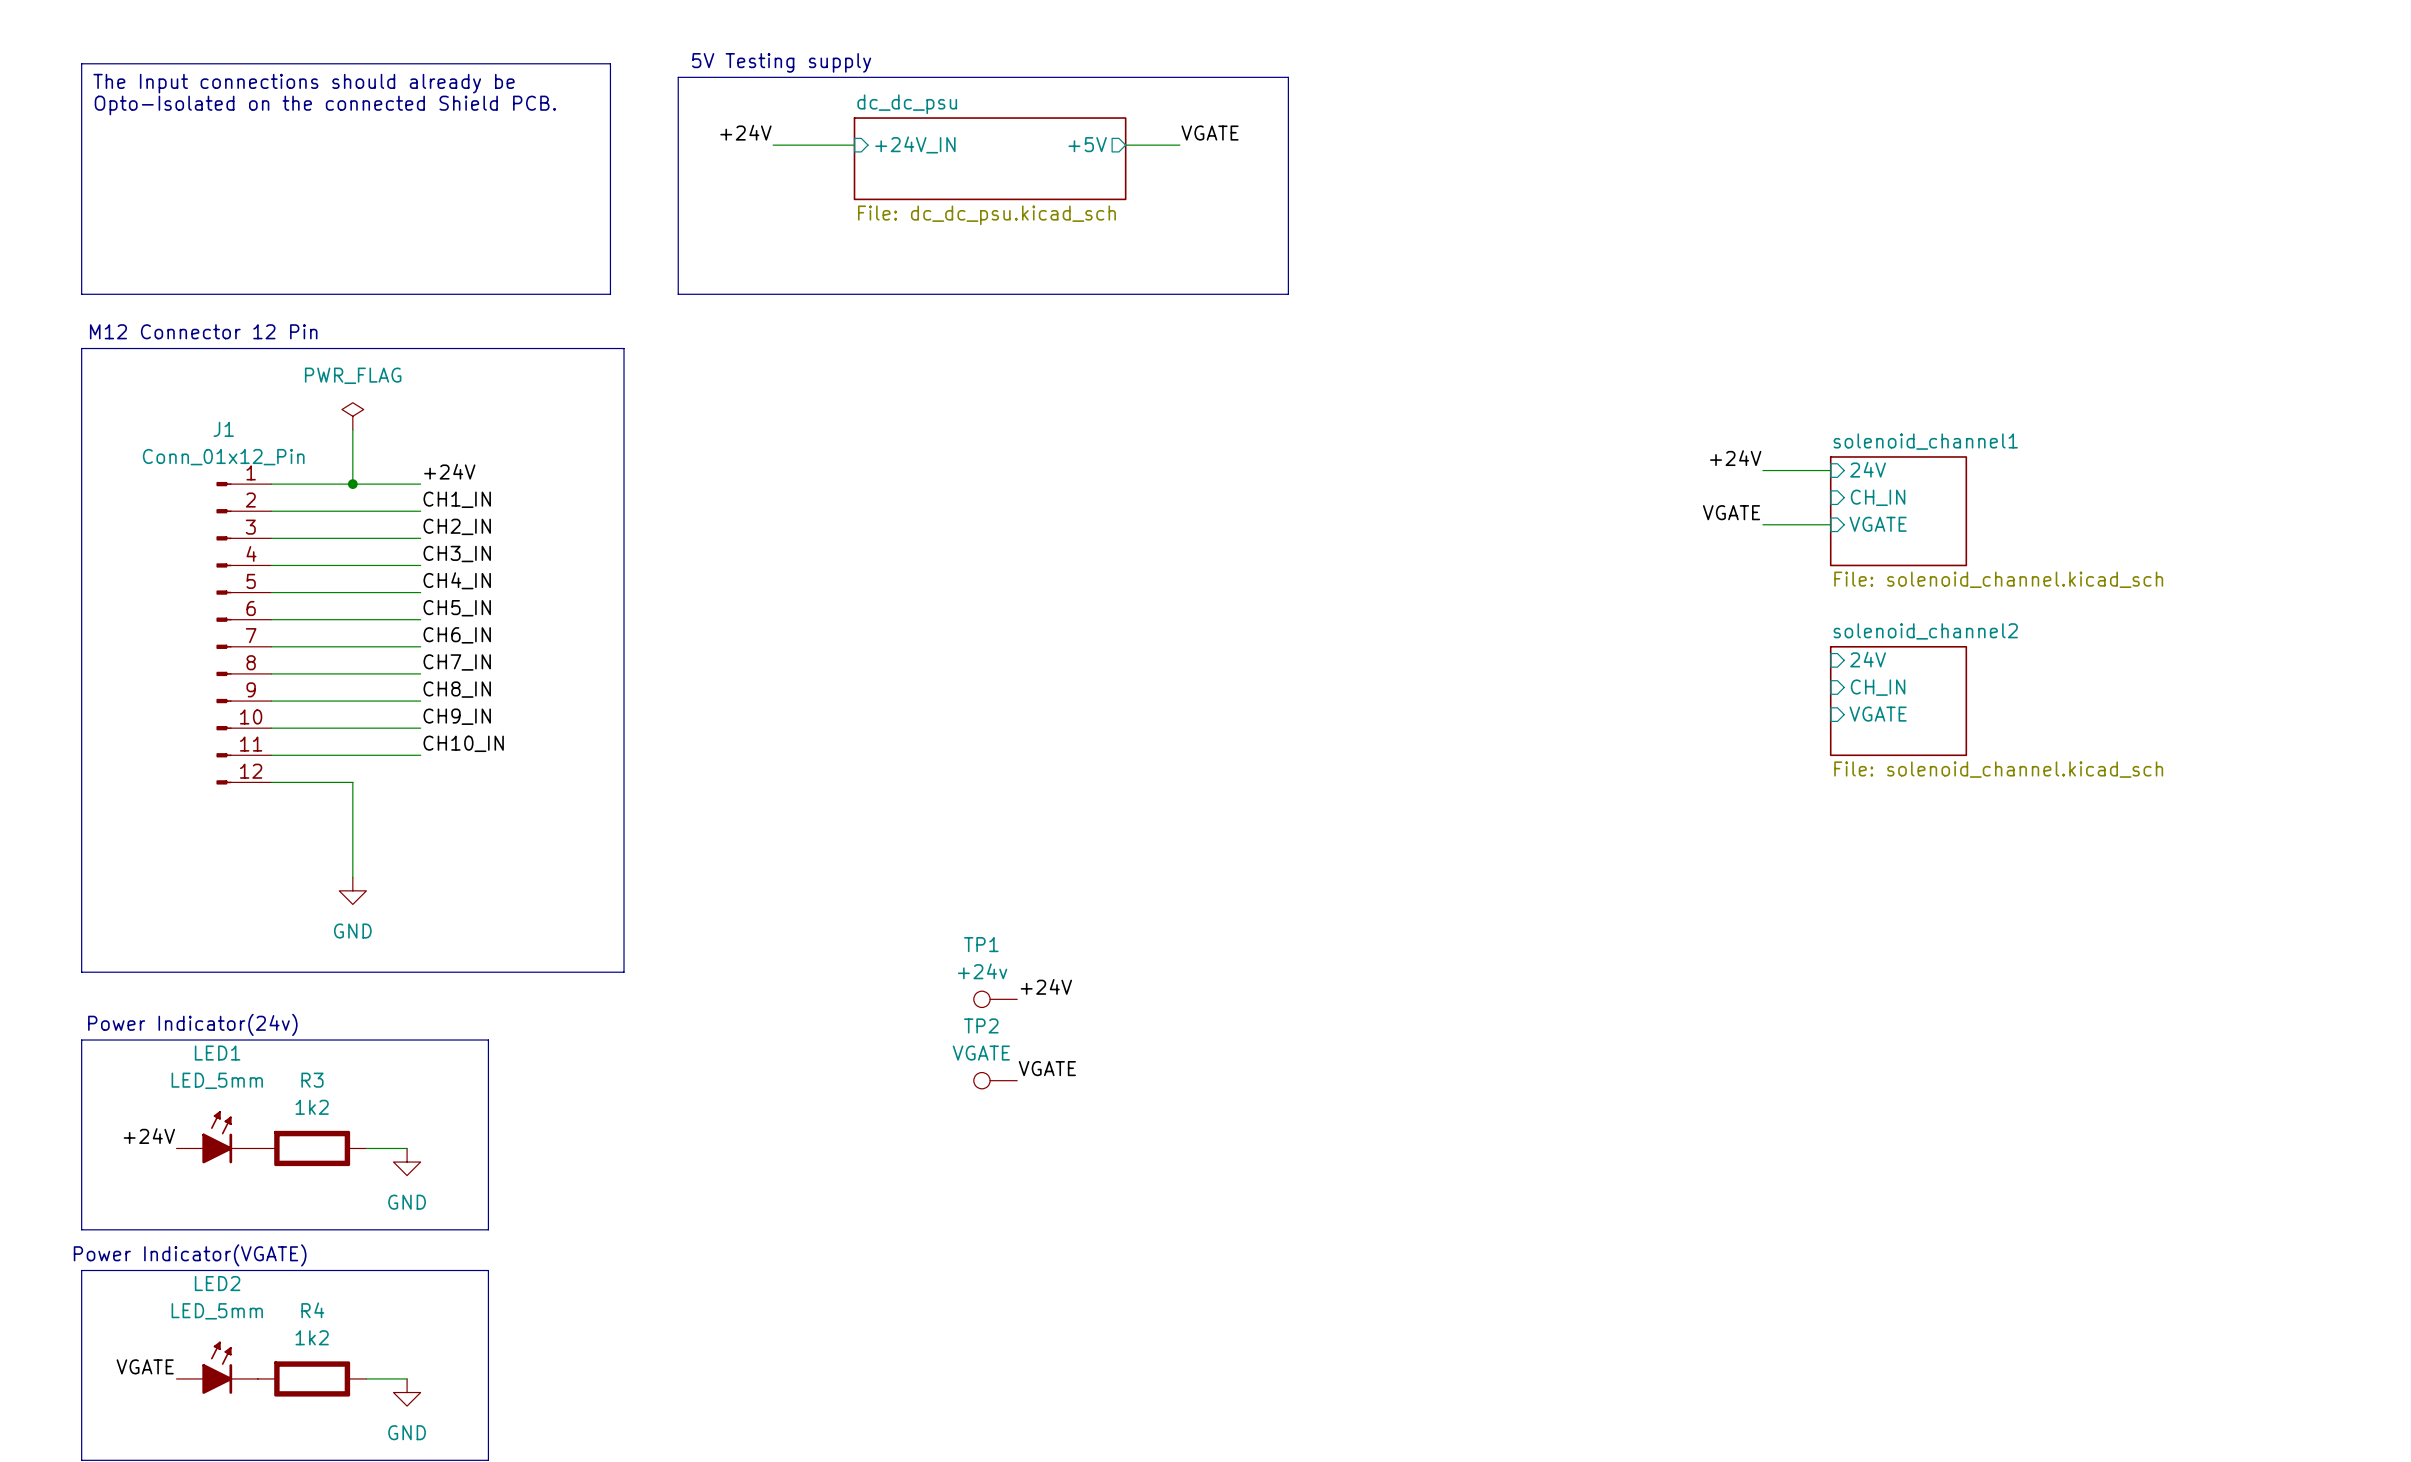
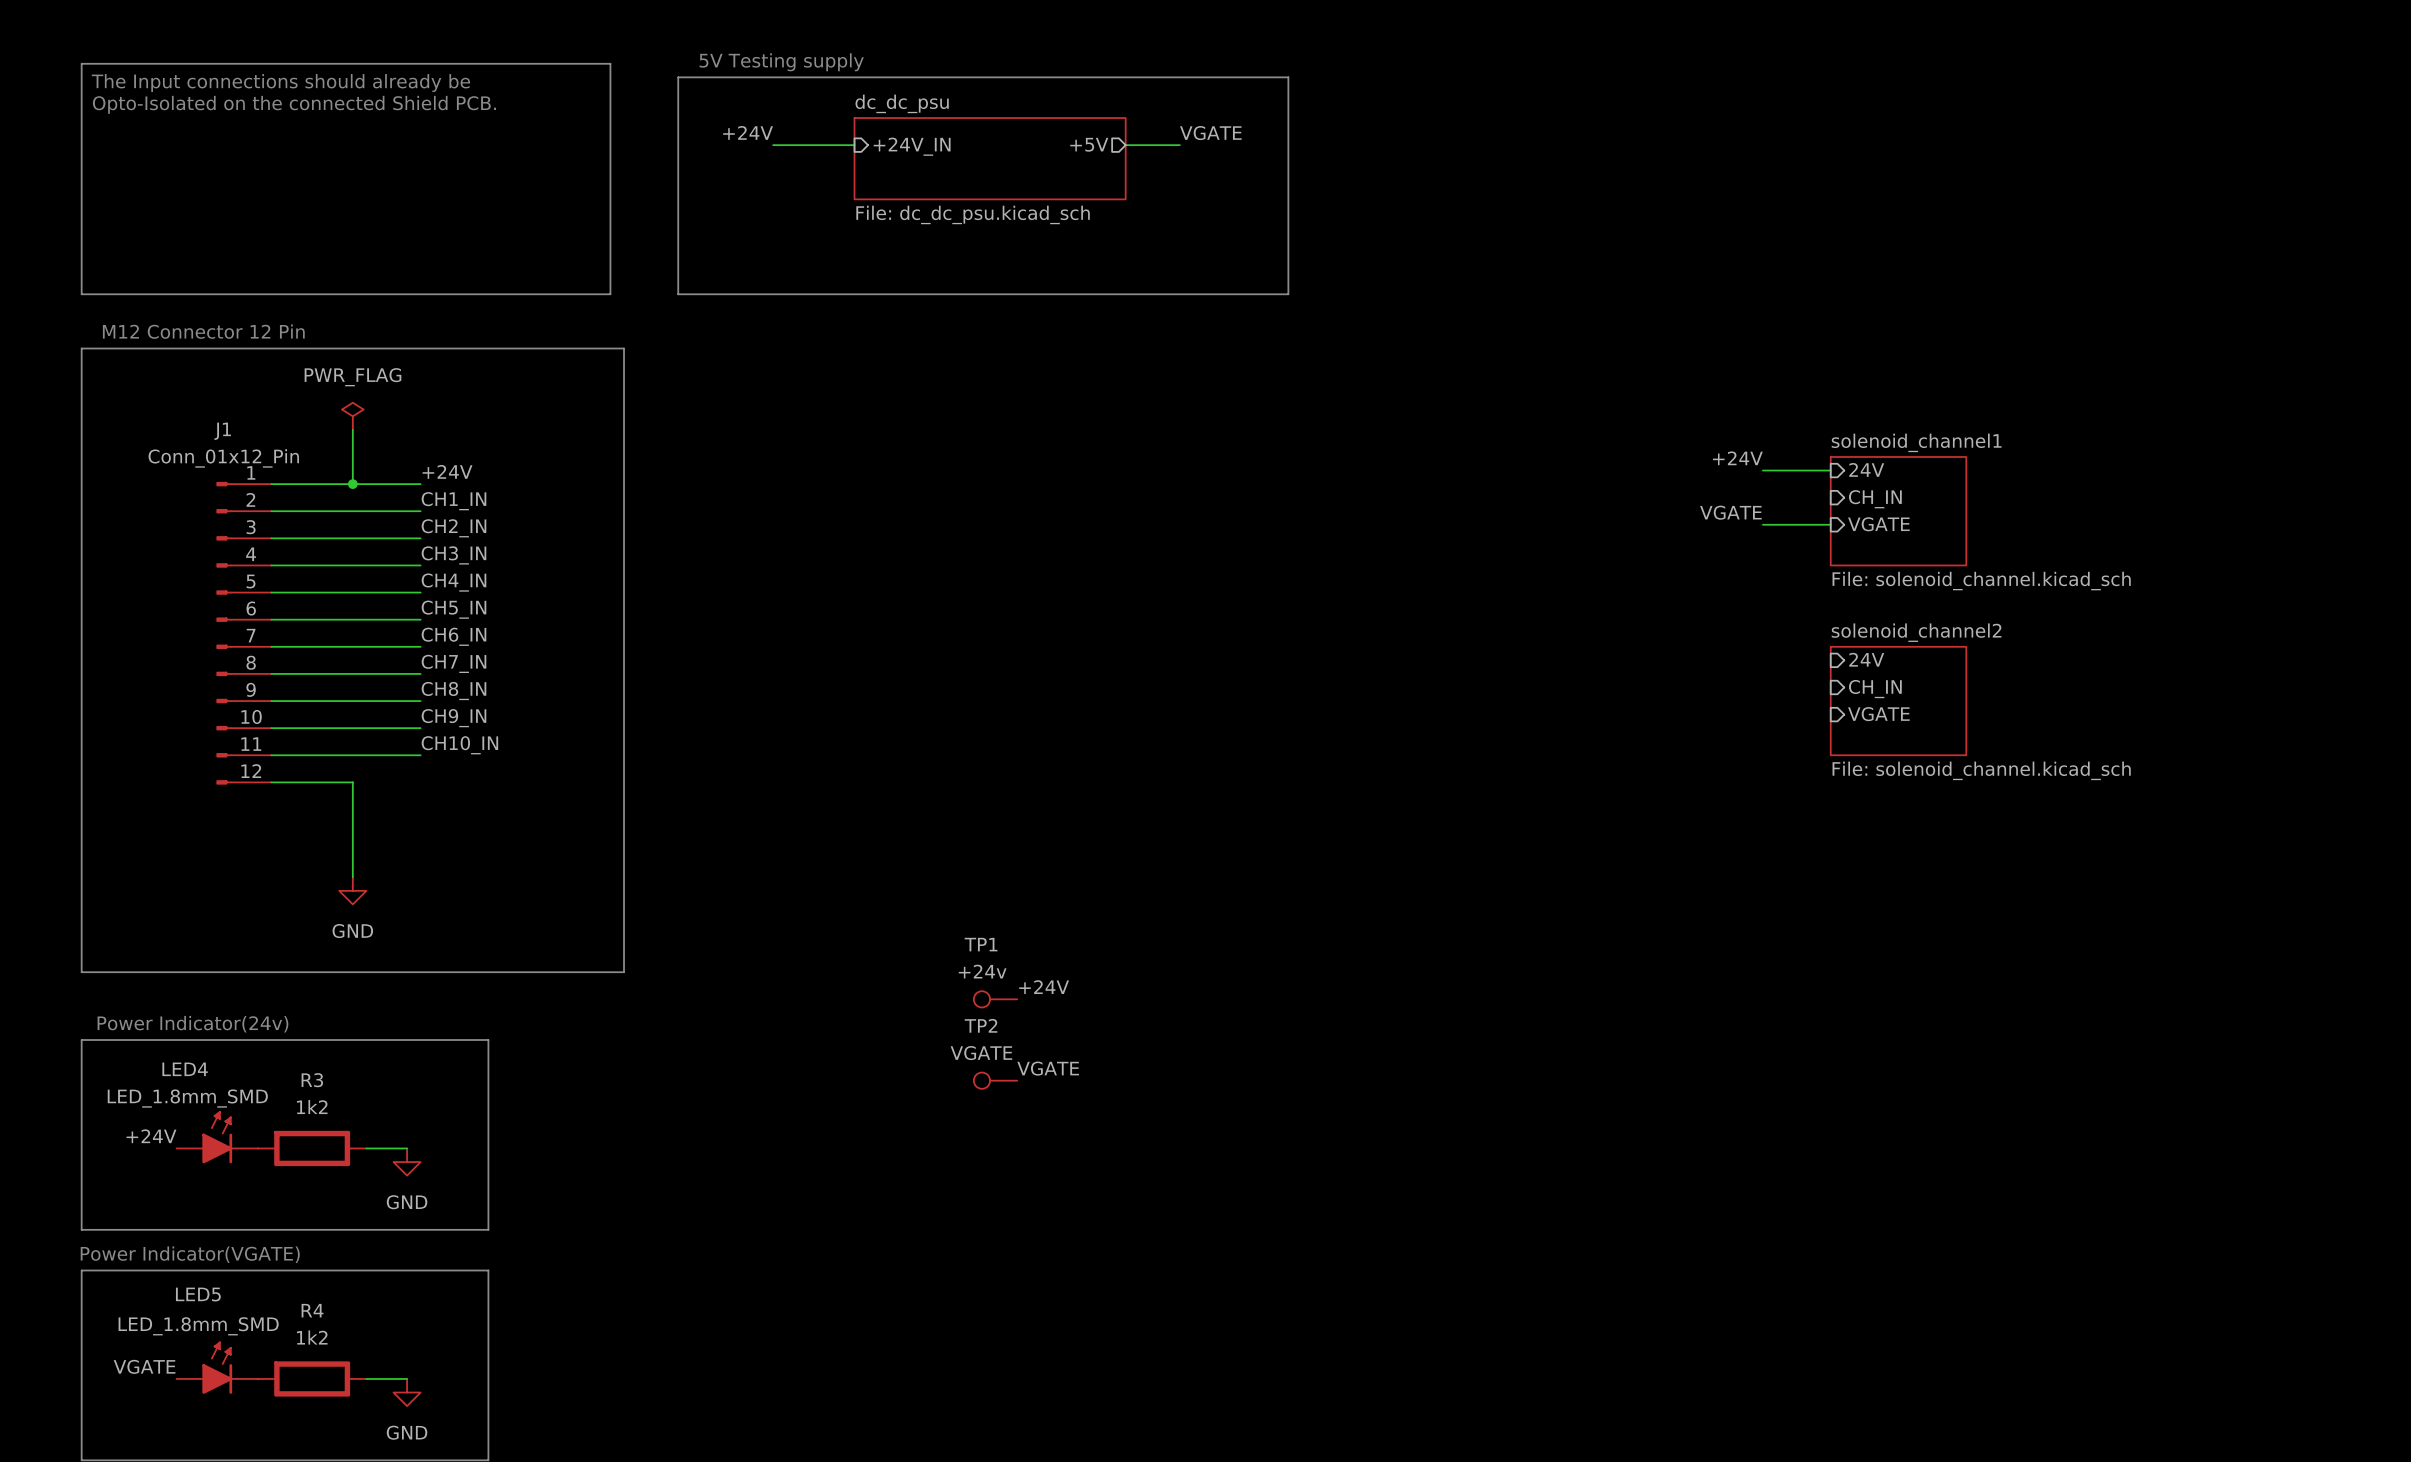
LED1 name: LED1 (217, 1053) -> LED4 (185, 1069)
LED1 value: LED_5mm (217, 1080) -> LED_1.8mm_SMD (187, 1098)
LED2 name: LED2 (217, 1283) -> LED5 (198, 1294)
LED2 value: LED_5mm (217, 1311) -> LED_1.8mm_SMD (198, 1326)

